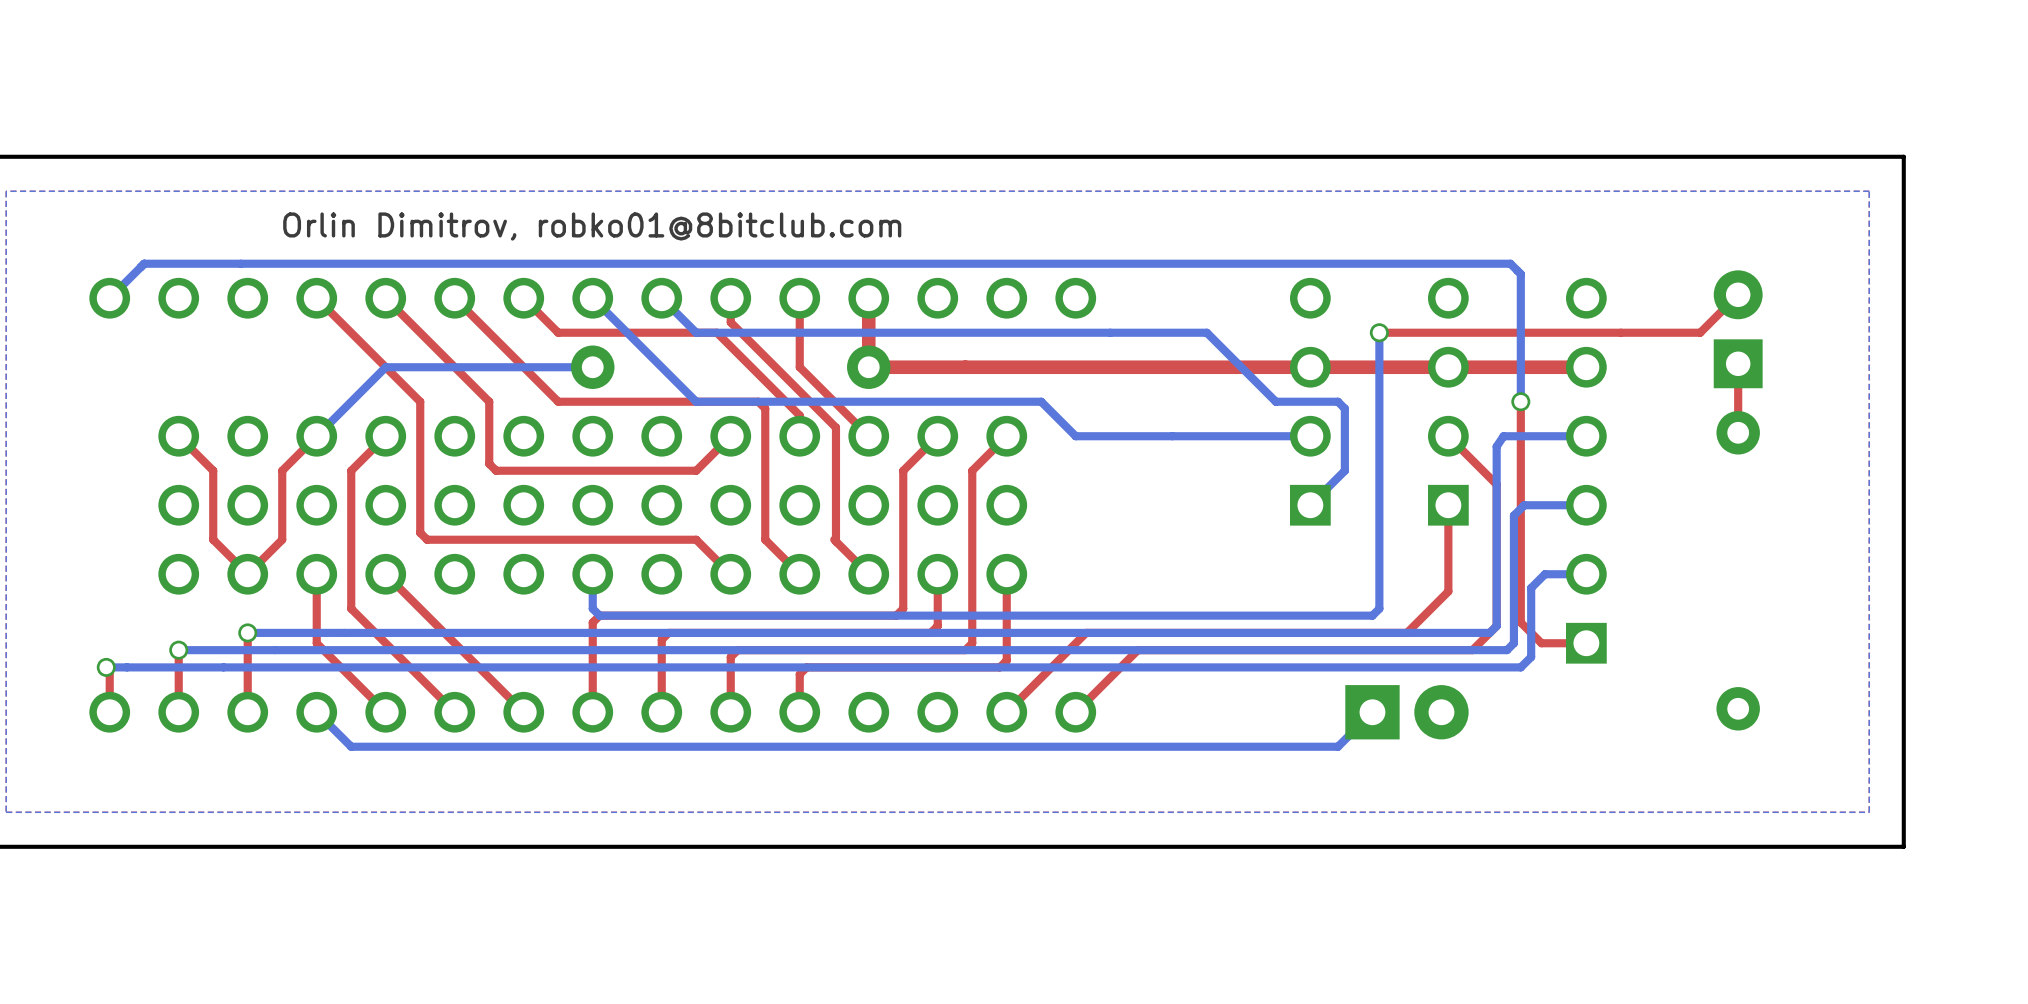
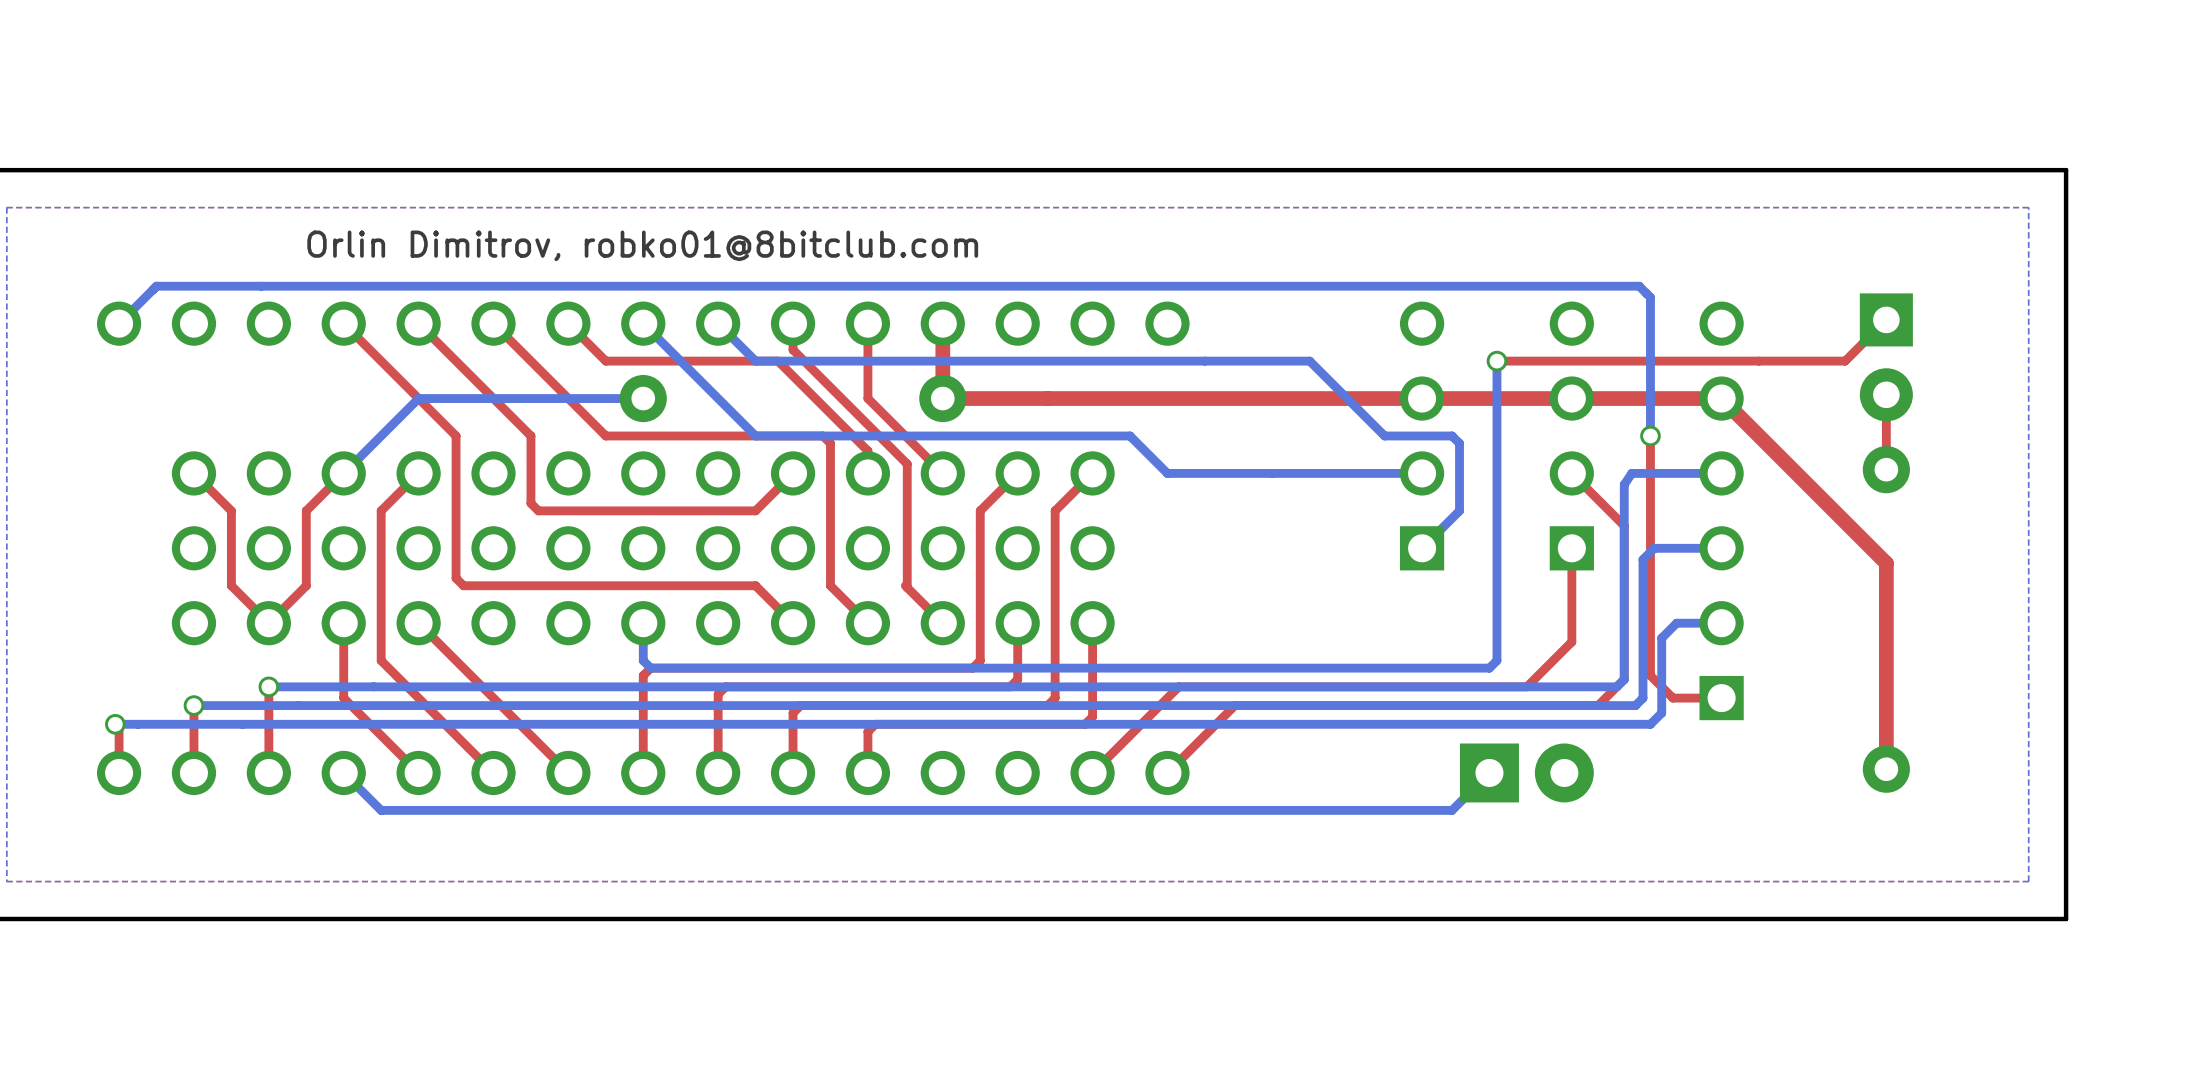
part rotation: 0° (1738, 329) -> 180° (1886, 357)
top track: none -> (1721, 398) (1886, 563) (1886, 769)

